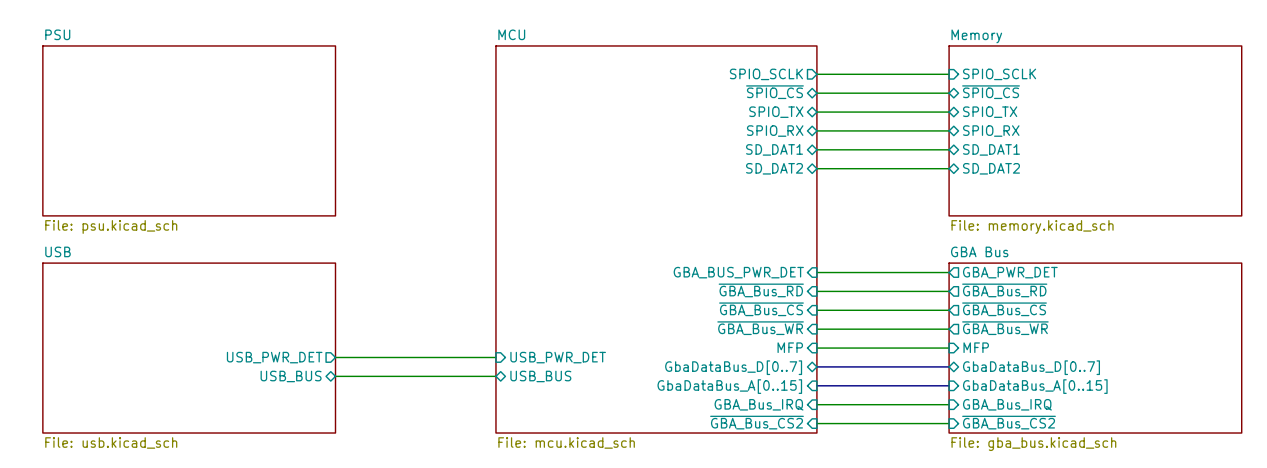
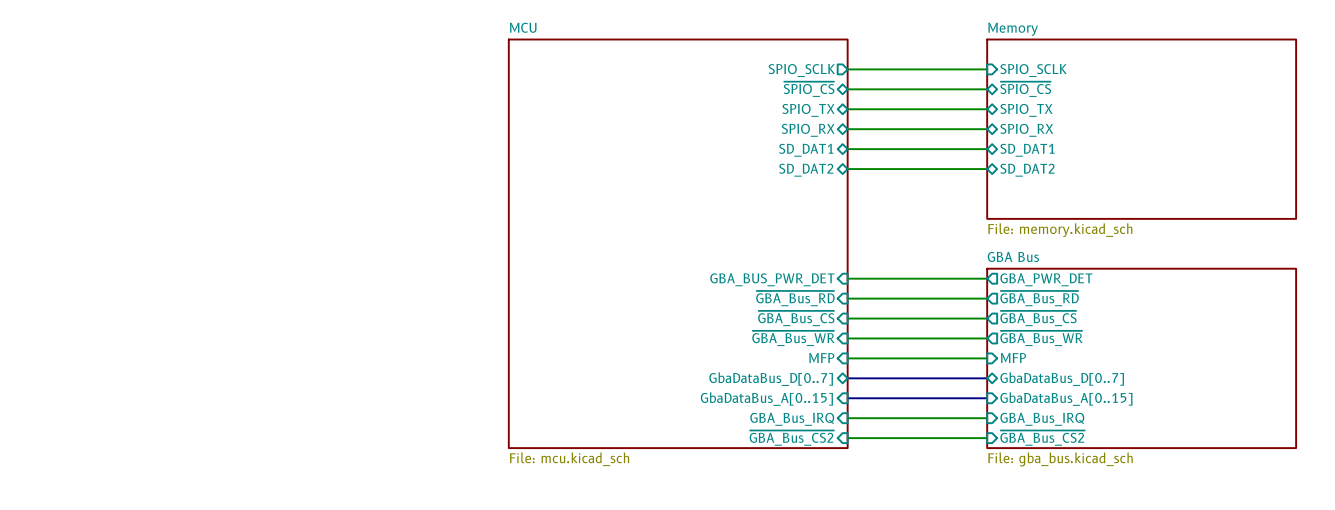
sheet PSU: File: psu.kicad_sch (189, 130) -> none
sheet USB: File: usb.kicad_sch (189, 348) -> none
sheet pin: USB_PWR_DET (274, 357) -> none
wire: (335, 357) (495, 357) -> none
sheet pin: USB_PWR_DET (558, 357) -> none
sheet pin: USB_BUS (291, 376) -> none
wire: (335, 376) (495, 376) -> none
sheet pin: USB_BUS (540, 376) -> none

